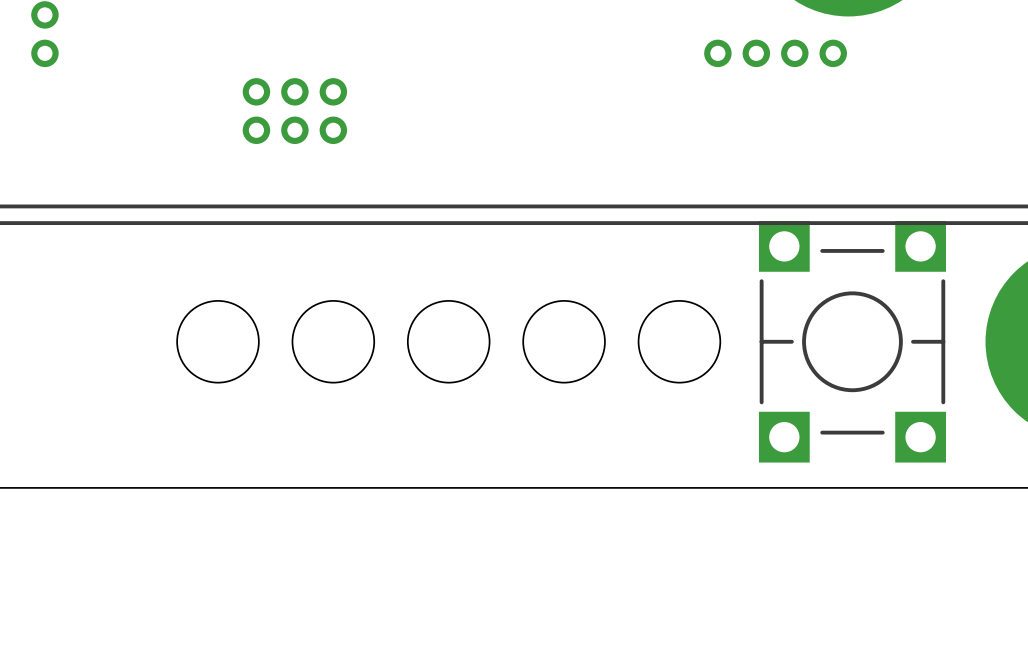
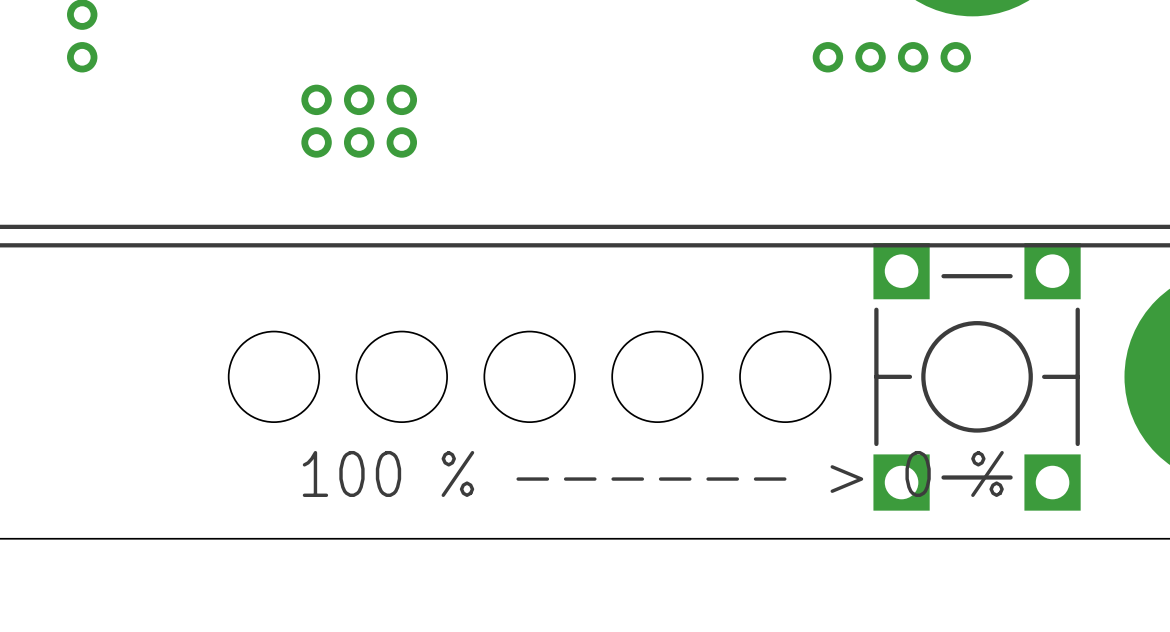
text: none -> 100 % ------ > 0 % (653, 473)

